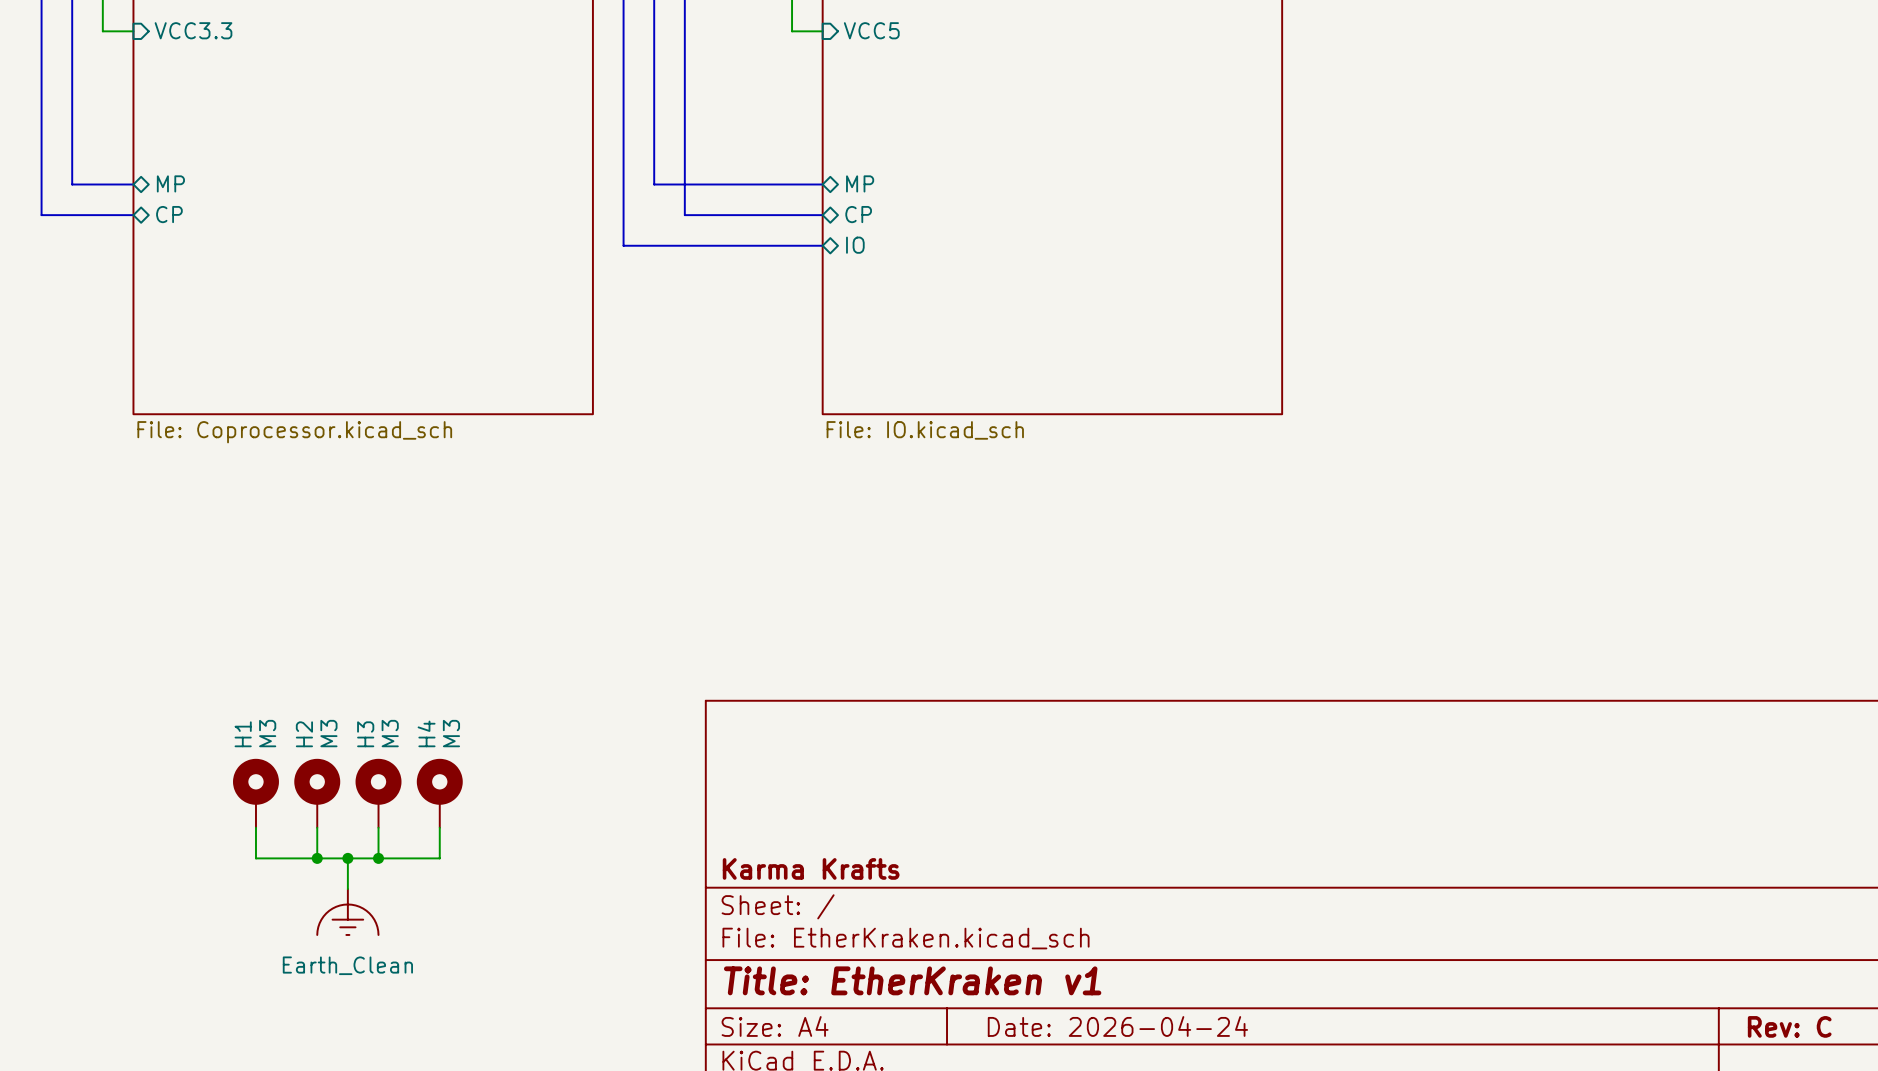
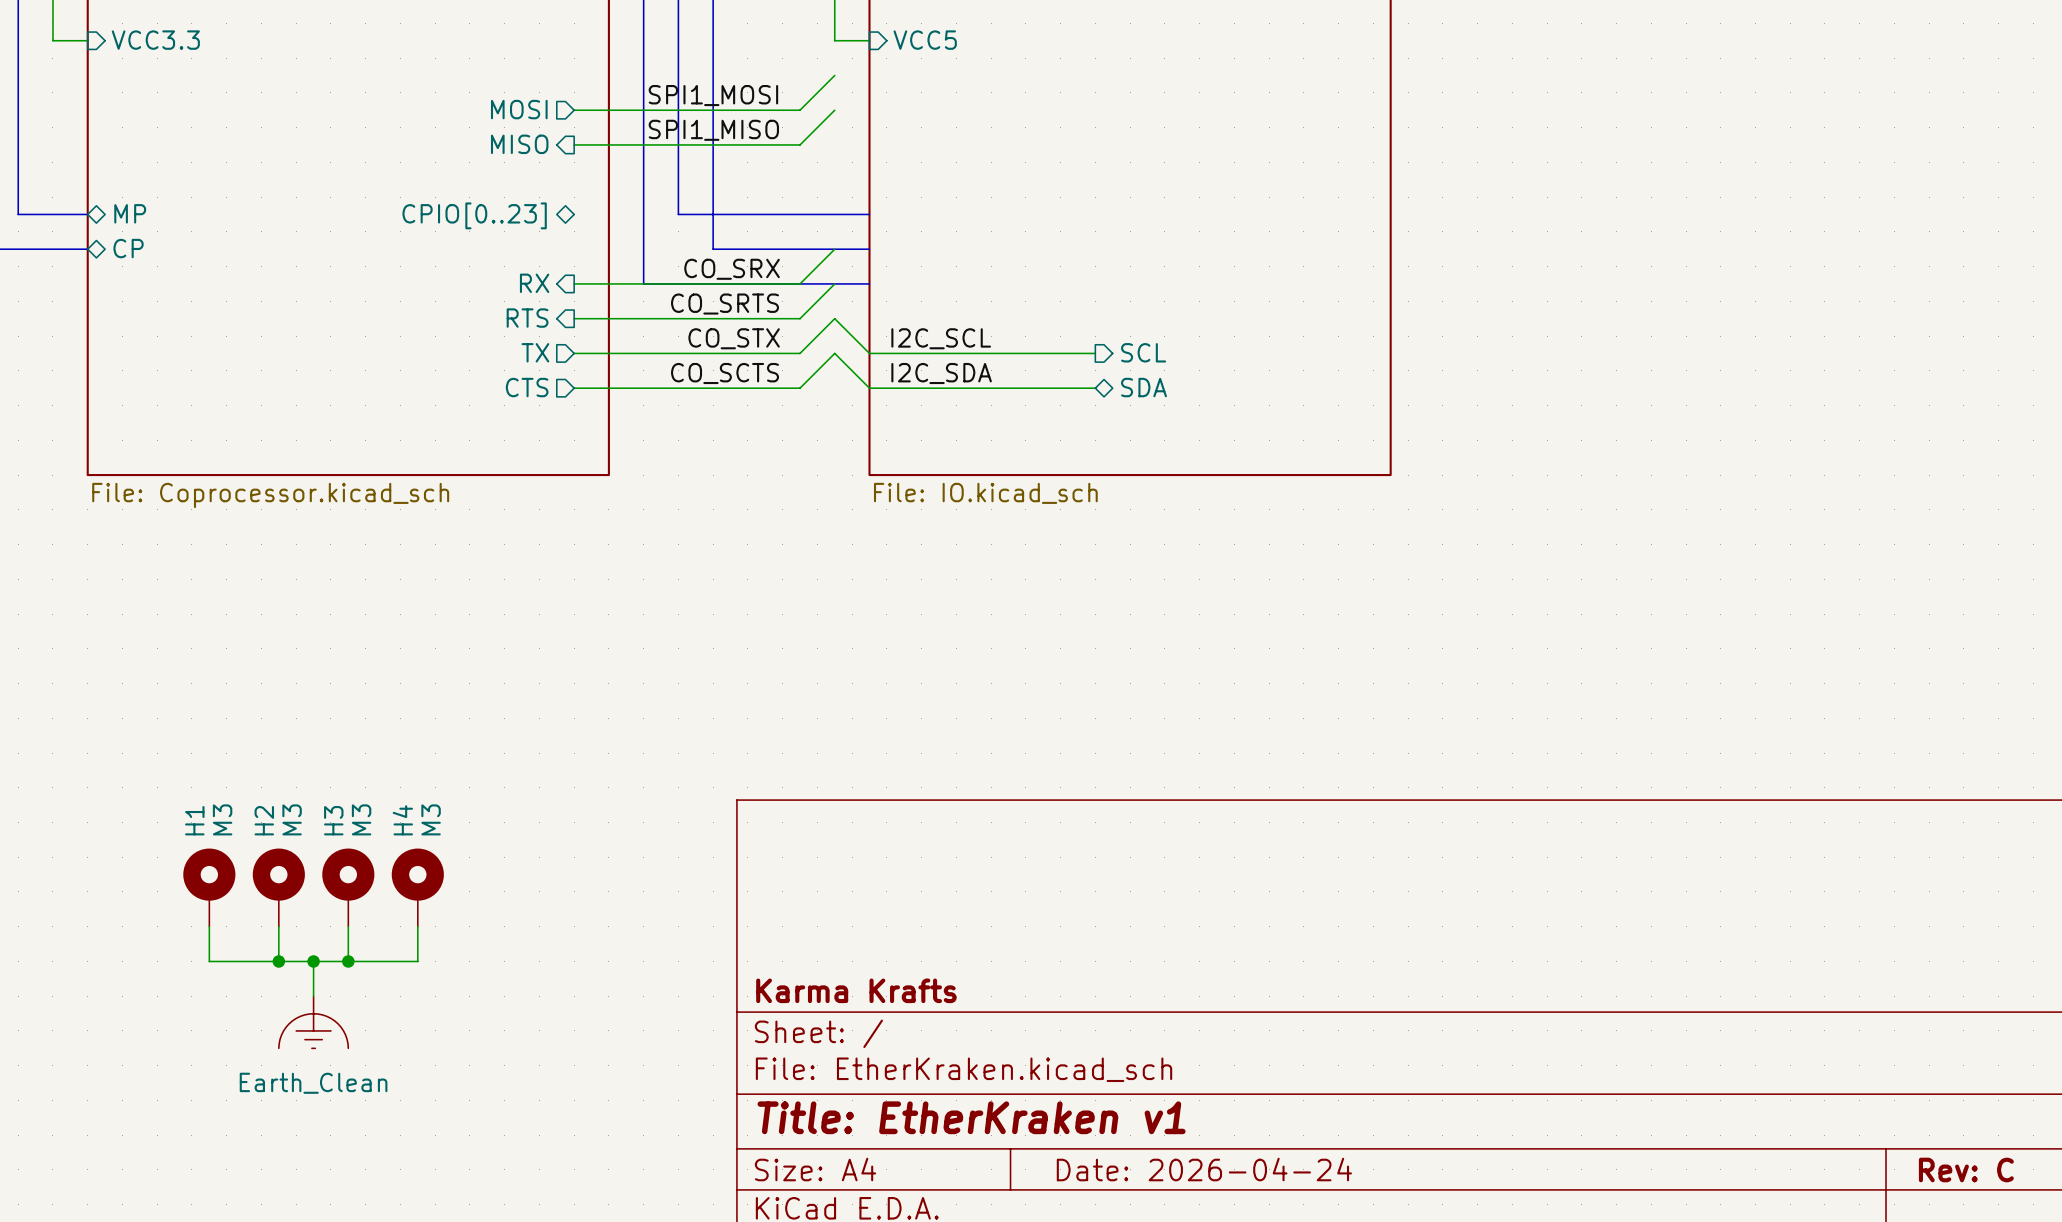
wire: none -> (834, 75) (800, 110) (574, 110)
label: none -> SPI1_MOSI (713, 95)
sheet pin: none -> MOSI (519, 109)
wire: none -> (834, 110) (800, 144) (574, 144)
label: none -> SPI1_MISO (713, 130)
sheet pin: none -> MISO (519, 144)
sheet pin: MP (860, 183) -> none
sheet pin: none -> CPIO[0..23] (474, 215)
sheet pin: CP (858, 214) -> none
wire: none -> (834, 249) (800, 283) (574, 283)
label: none -> CO_SRX (732, 269)
sheet pin: none -> RX (534, 283)
wire: none -> (834, 283) (800, 318) (574, 318)
sheet pin: IO (855, 245) -> none
label: none -> CO_SRTS (725, 304)
sheet pin: none -> RTS (527, 318)
label: none -> CO_STX (734, 338)
label: none -> I2C_SCL (941, 338)
sheet pin: none -> TX (535, 352)
sheet pin: none -> SCL (1143, 352)
wire: none -> (574, 353) (800, 353) (834, 318) (869, 353) (1095, 353)
label: none -> CO_SCTS (725, 373)
label: none -> I2C_SDA (941, 373)
sheet pin: none -> CTS (527, 387)
wire: none -> (574, 388) (800, 388) (834, 353) (869, 388) (1095, 388)
sheet pin: none -> SDA (1144, 387)
H1 position: (255, 793) -> (209, 887)
H2 position: (317, 793) -> (278, 887)
H3 position: (378, 793) -> (348, 887)
H4 position: (439, 793) -> (417, 887)
wire: (255, 827) (255, 858) (439, 858) (439, 827) -> (209, 926) (209, 961) (417, 961) (417, 926)
wire: (317, 827) (317, 858) -> (278, 926) (278, 961)
wire: (378, 827) (378, 858) -> (348, 926) (348, 961)
junction: none -> (278, 961)
junction: none -> (313, 961)
junction: none -> (348, 961)
junction: (317, 858) -> none
wire: (347, 858) (347, 889) -> (313, 961) (313, 996)
junction: (347, 858) -> none
junction: (378, 858) -> none
power symbol position: Earth_Clean (347, 912) -> Earth_Clean (313, 1022)

